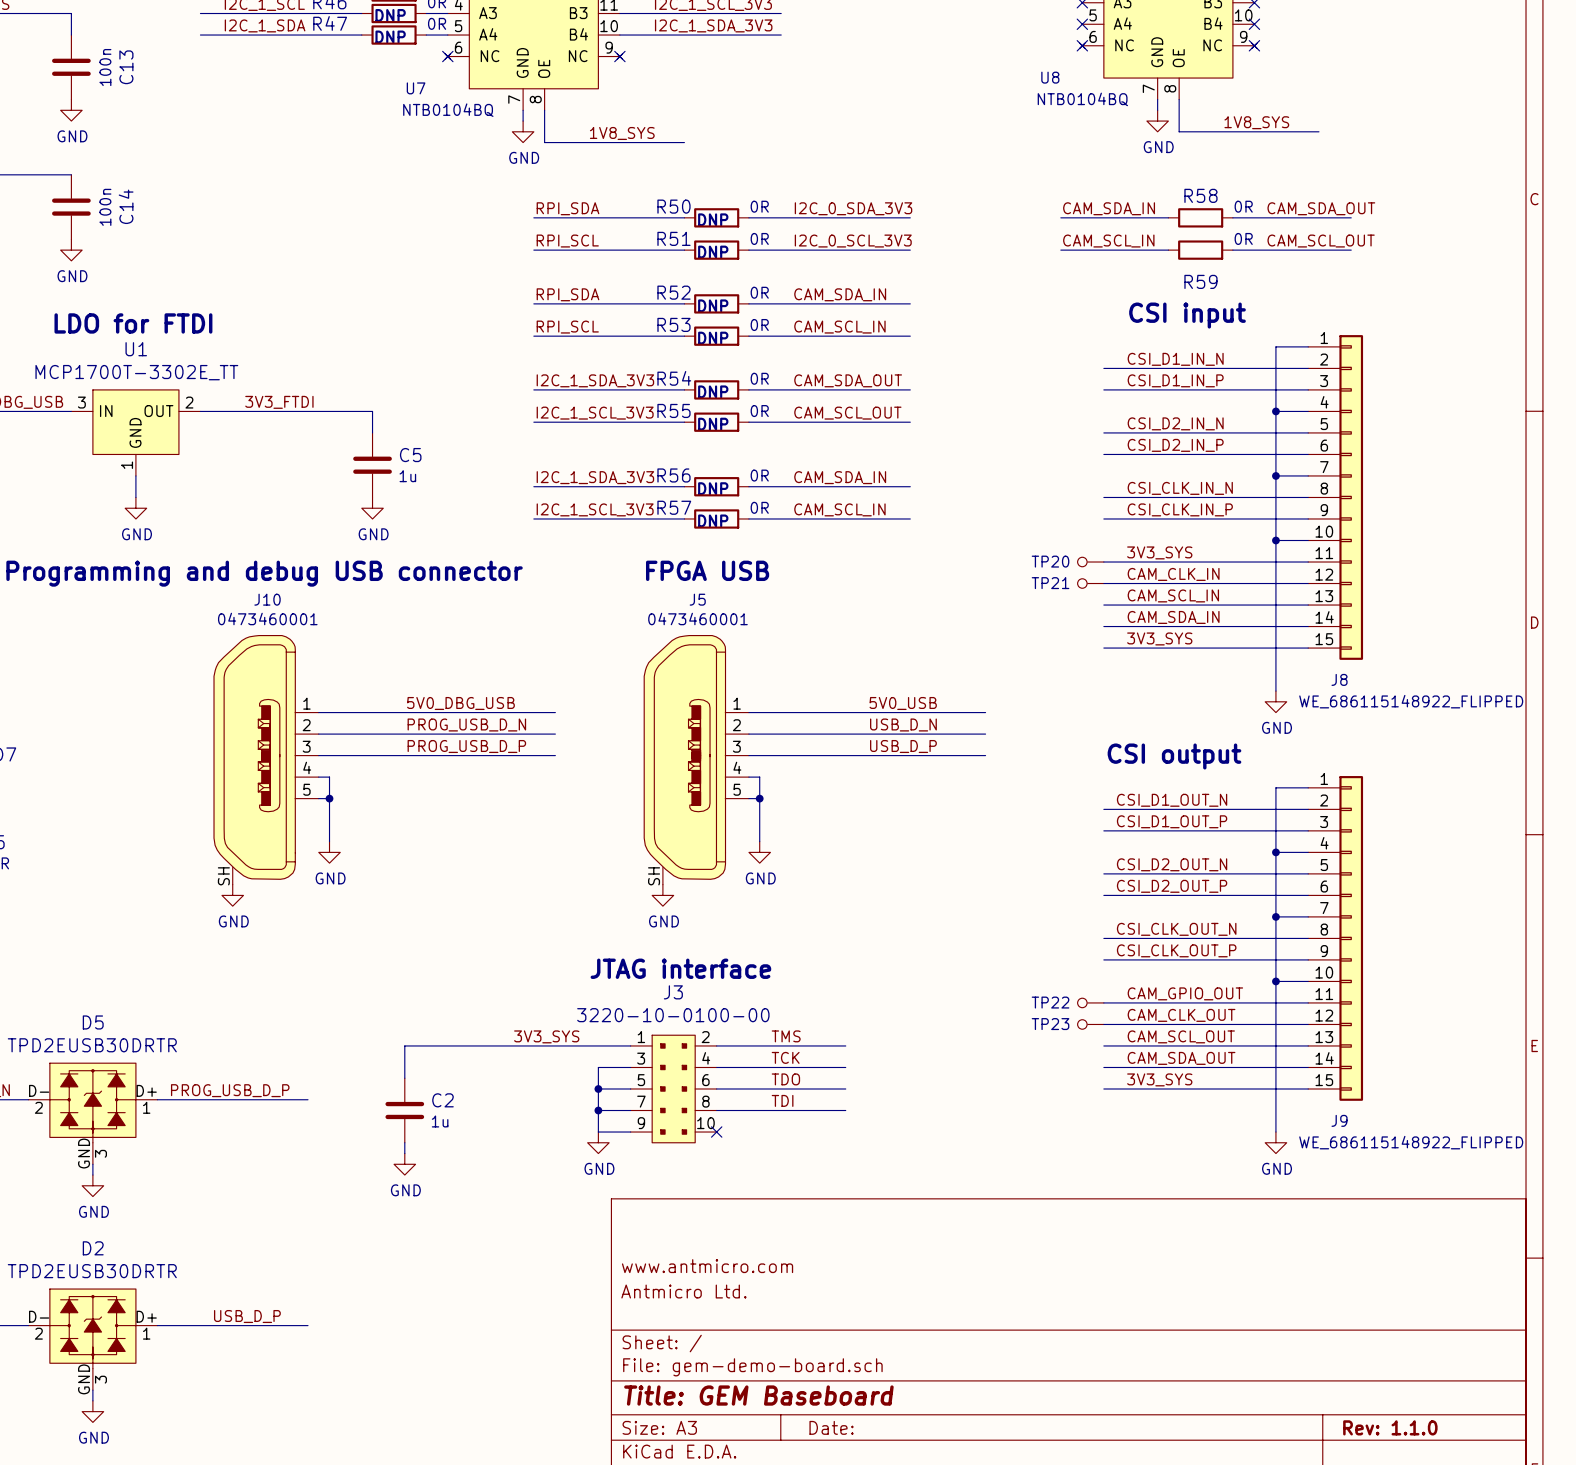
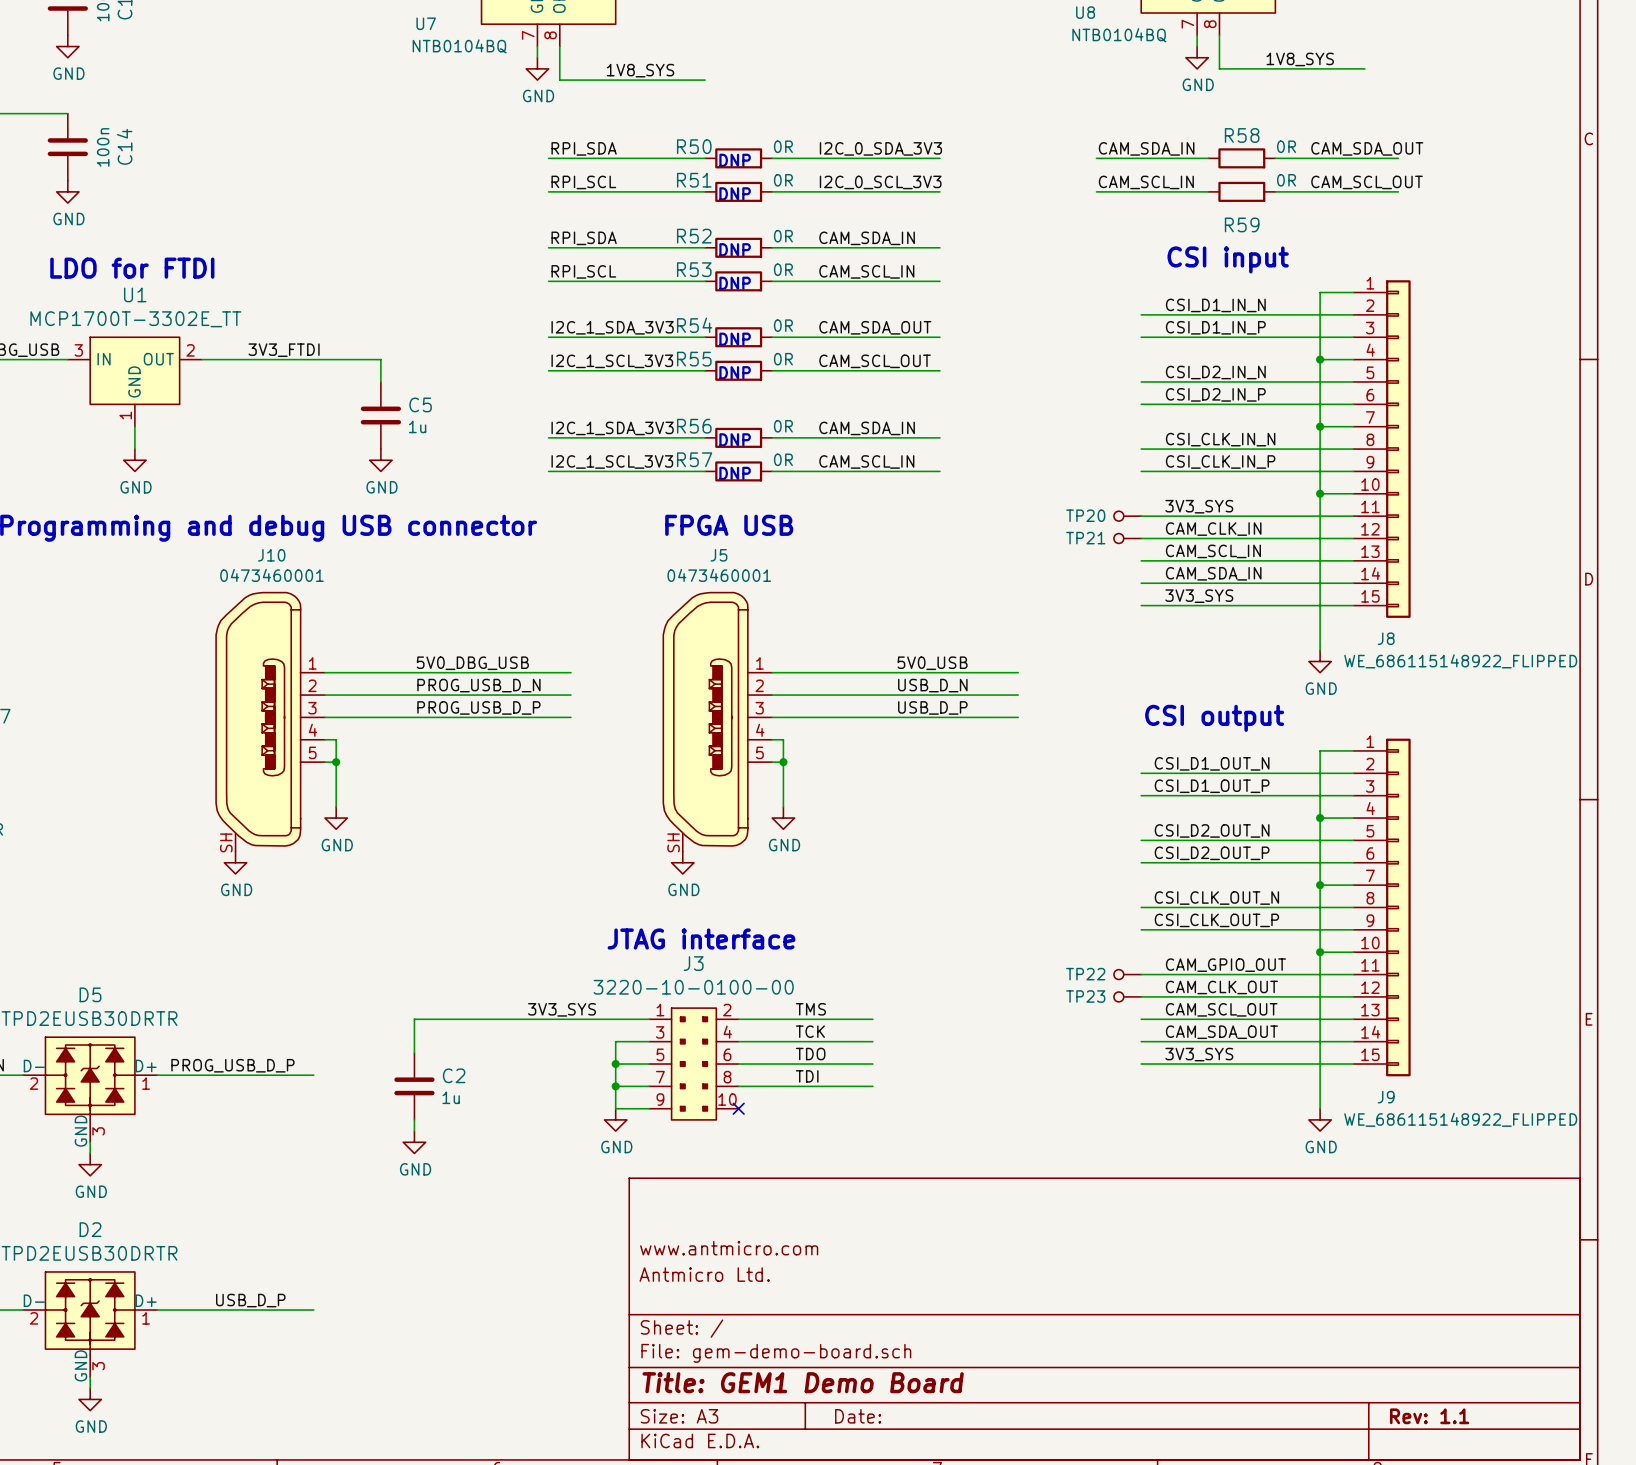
title block: Title: GEM Baseboard (758, 1395) -> Title: GEM1 Demo Board (803, 1382)
title block: Rev: 1.1.0 (1390, 1427) -> Rev: 1.1 (1429, 1416)

